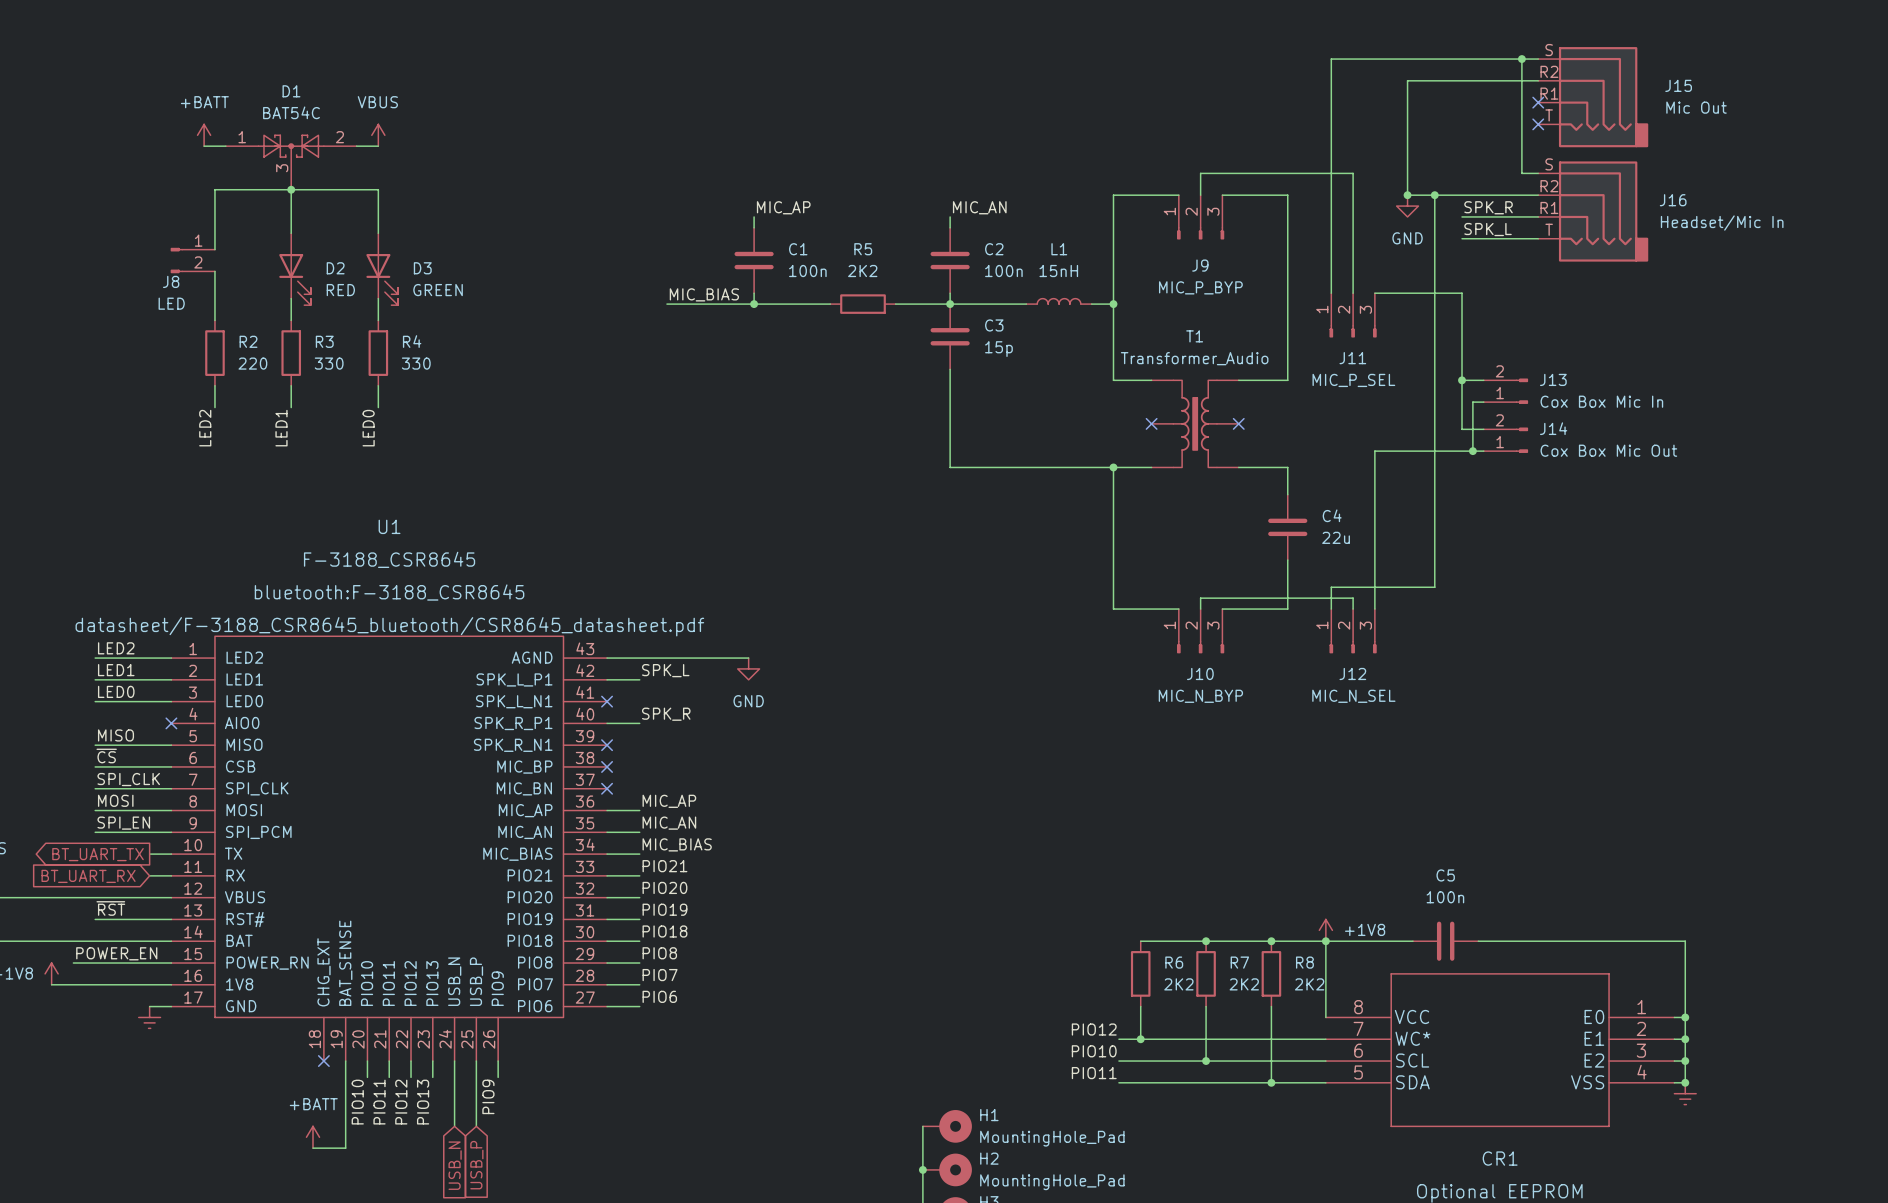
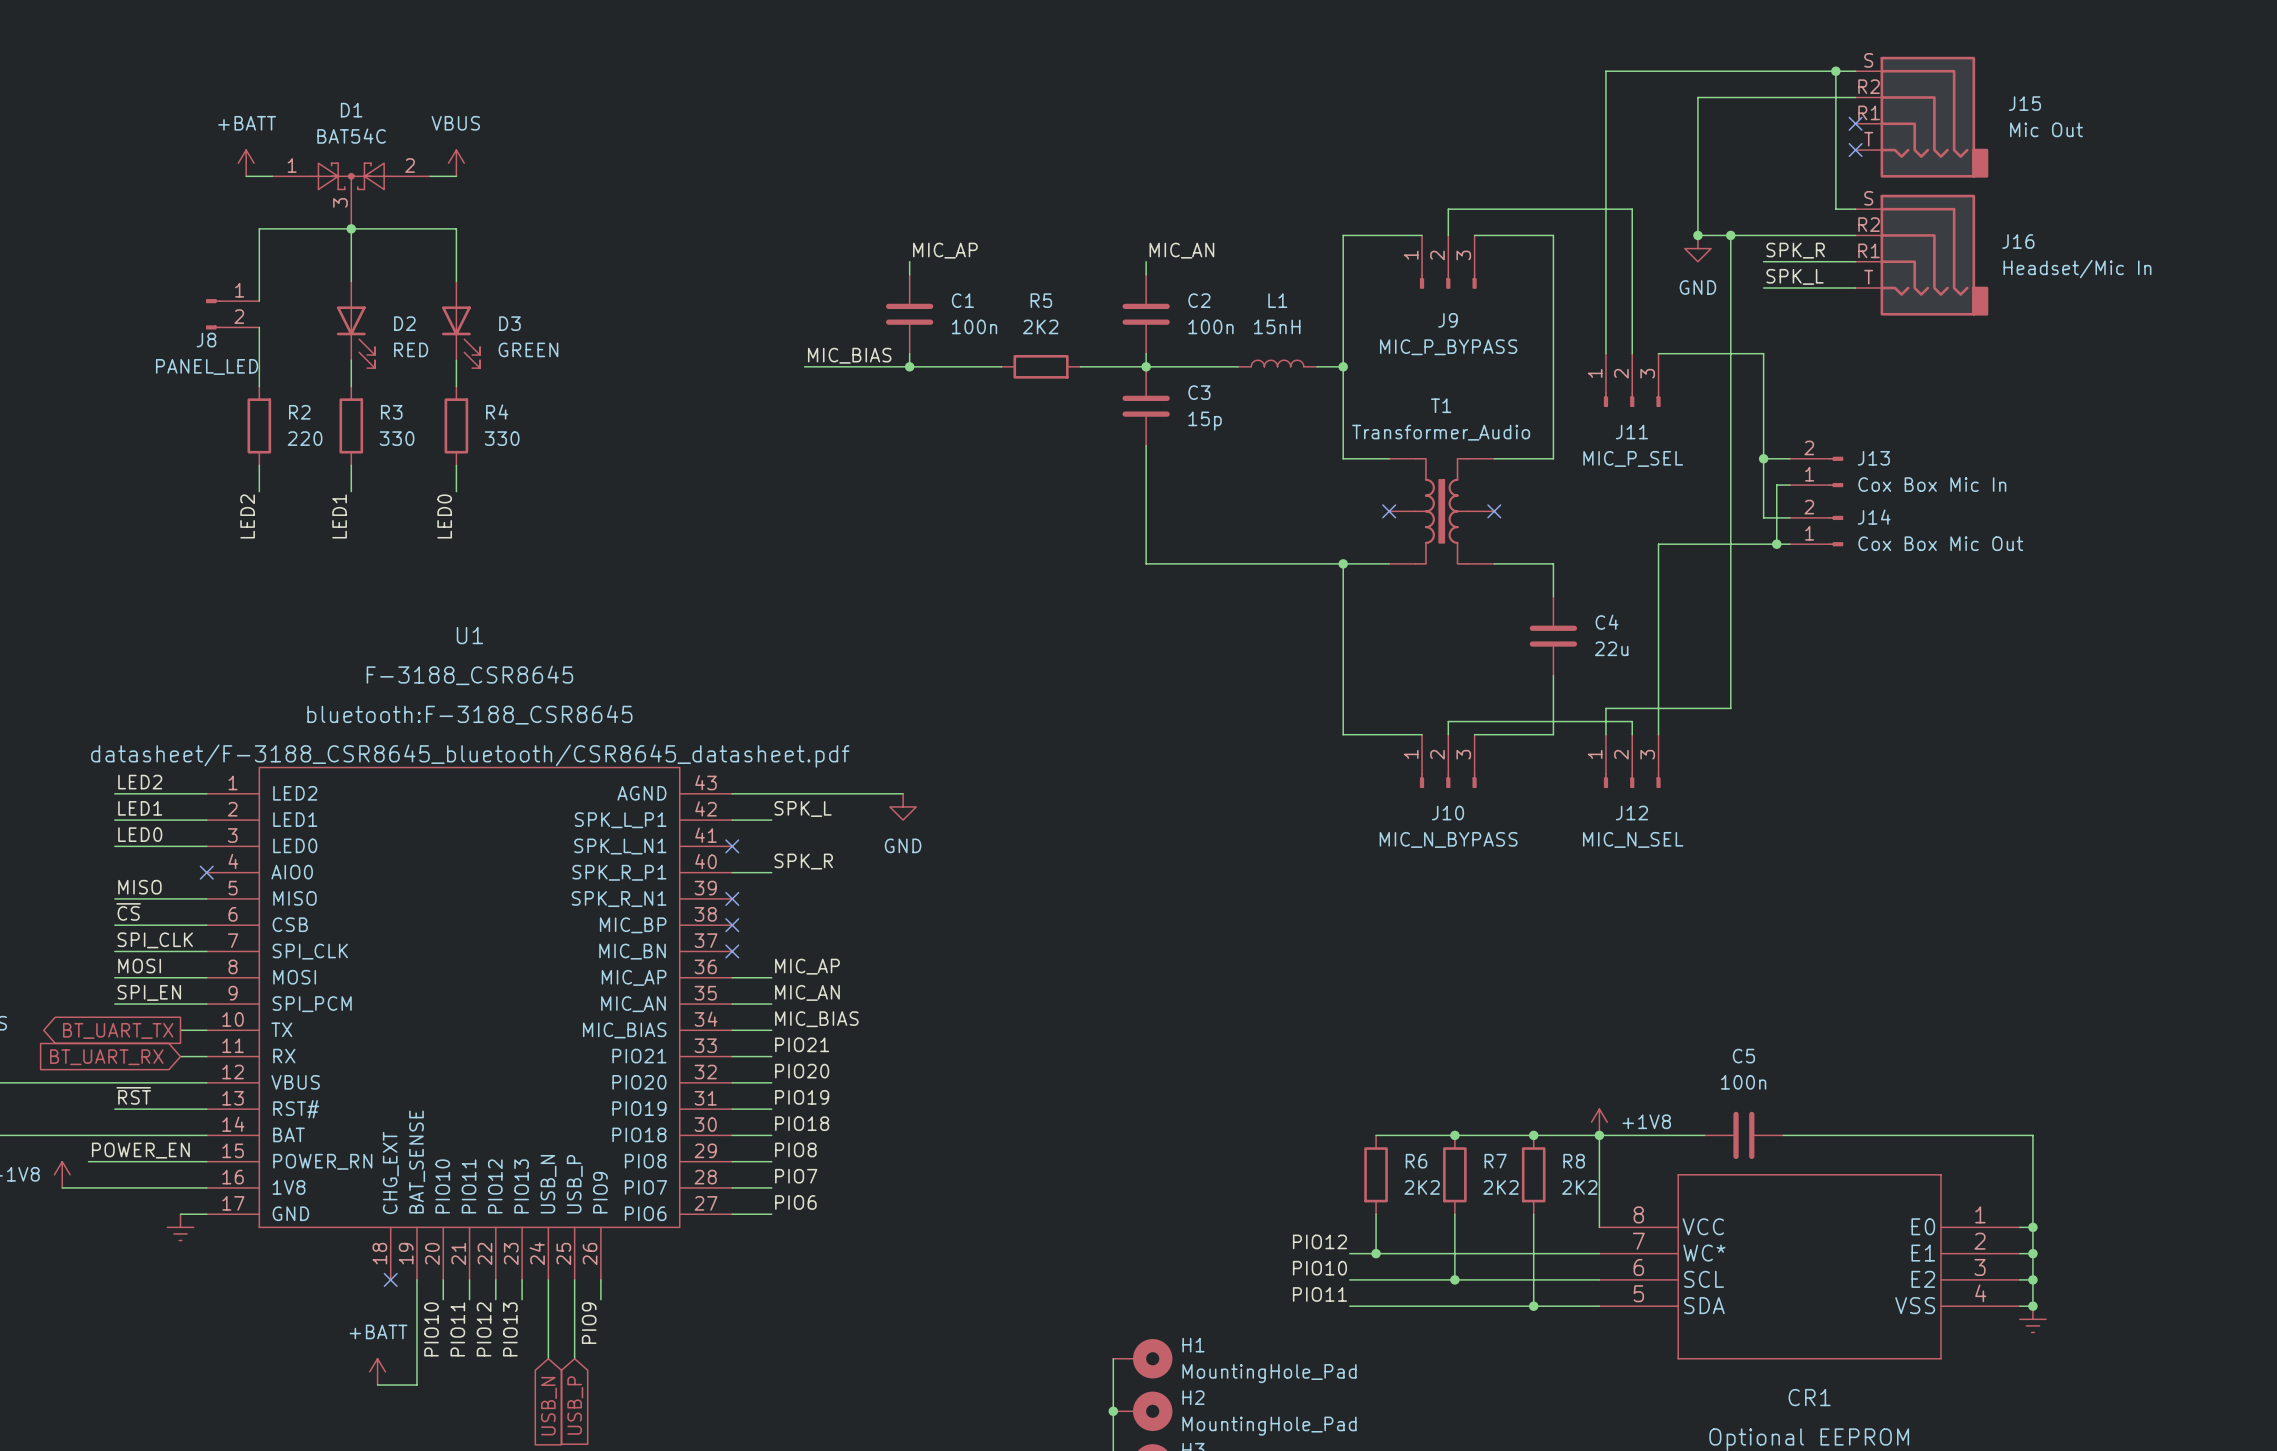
J9 value: MIC_P_BYP (1200, 287) -> MIC_P_BYPASS (1448, 347)
J8 value: LED (171, 303) -> PANEL_LED (207, 366)
J10 value: MIC_N_BYP (1200, 696) -> MIC_N_BYPASS (1448, 839)

